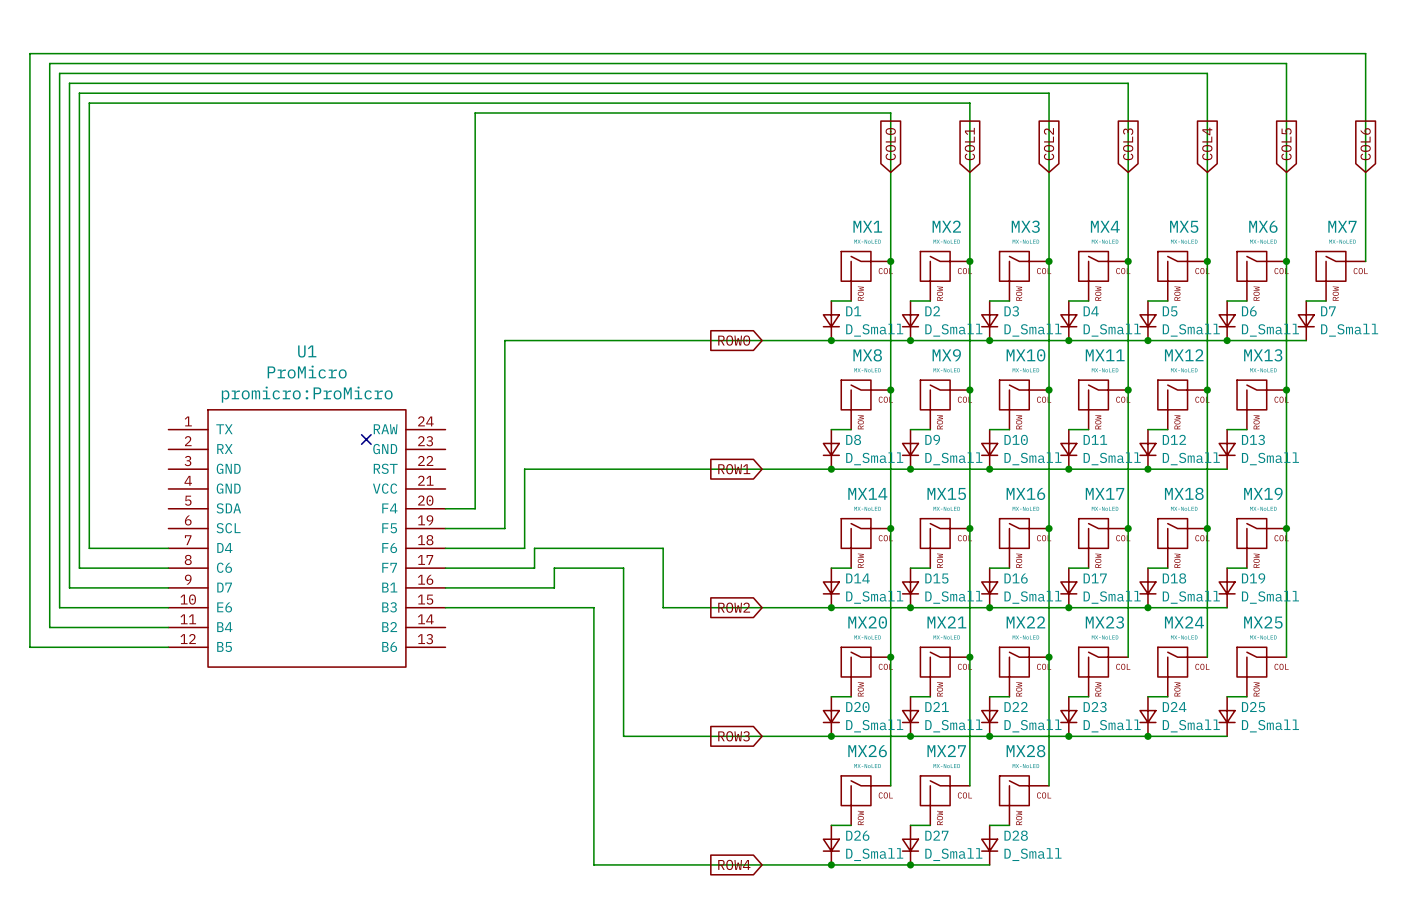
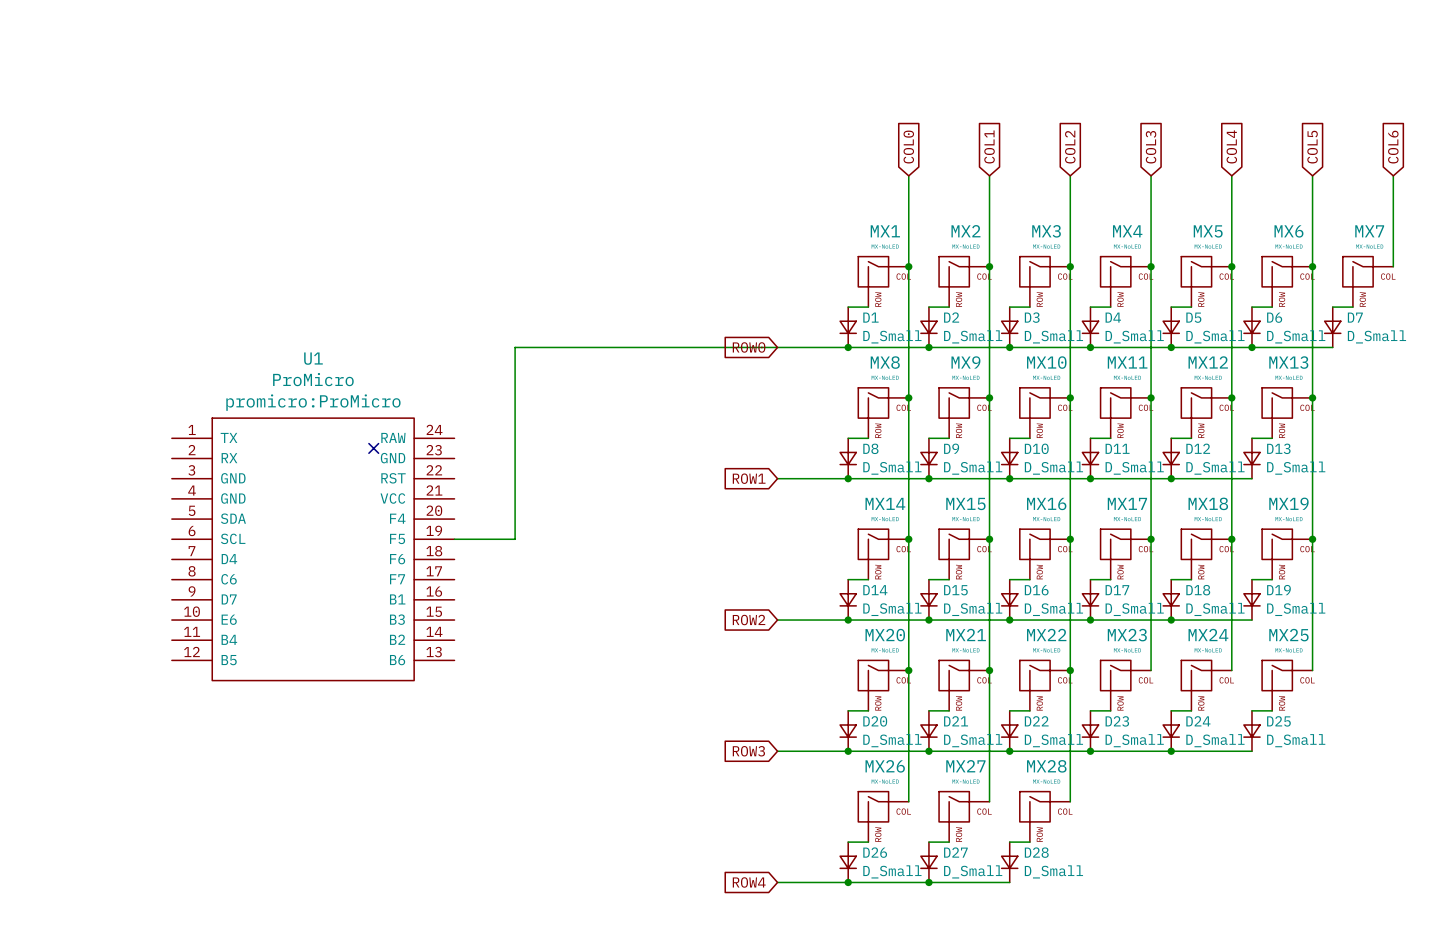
wire: (890, 172) (890, 113) (475, 113) (475, 508) (445, 508) -> none
wire: (969, 172) (969, 103) (89, 103) (89, 548) (168, 548) -> none
wire: (1049, 172) (1049, 93) (79, 93) (79, 568) (168, 568) -> none
wire: (1128, 172) (1128, 83) (69, 83) (69, 587) (168, 587) -> none
wire: (1207, 172) (1207, 73) (59, 73) (59, 607) (168, 607) -> none
wire: (1286, 172) (1286, 63) (49, 63) (49, 627) (168, 627) -> none
wire: (1365, 172) (1365, 53) (29, 53) (29, 647) (168, 647) -> none
wire: (762, 469) (524, 469) (524, 548) (445, 548) -> none
wire: (445, 568) (534, 568) (534, 548) (663, 548) (663, 607) (762, 607) -> none
wire: (445, 587) (554, 587) (554, 568) (623, 568) (623, 736) (762, 736) -> none
wire: (445, 607) (593, 607) (593, 864) (762, 864) -> none

